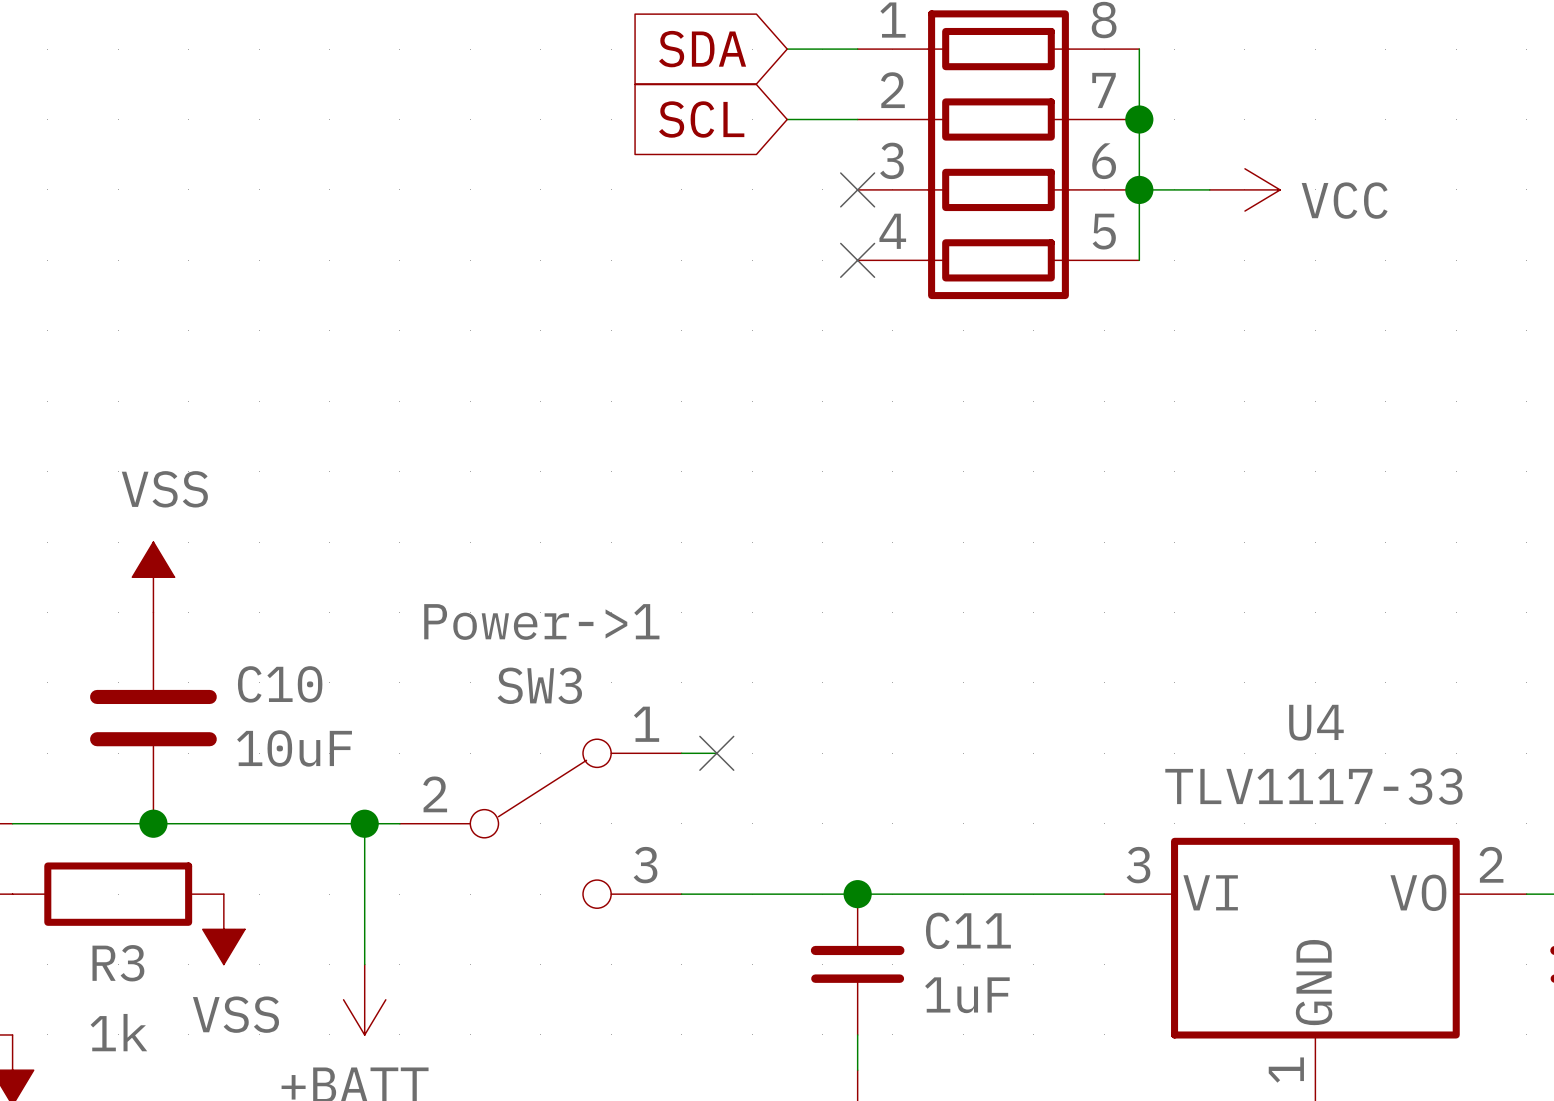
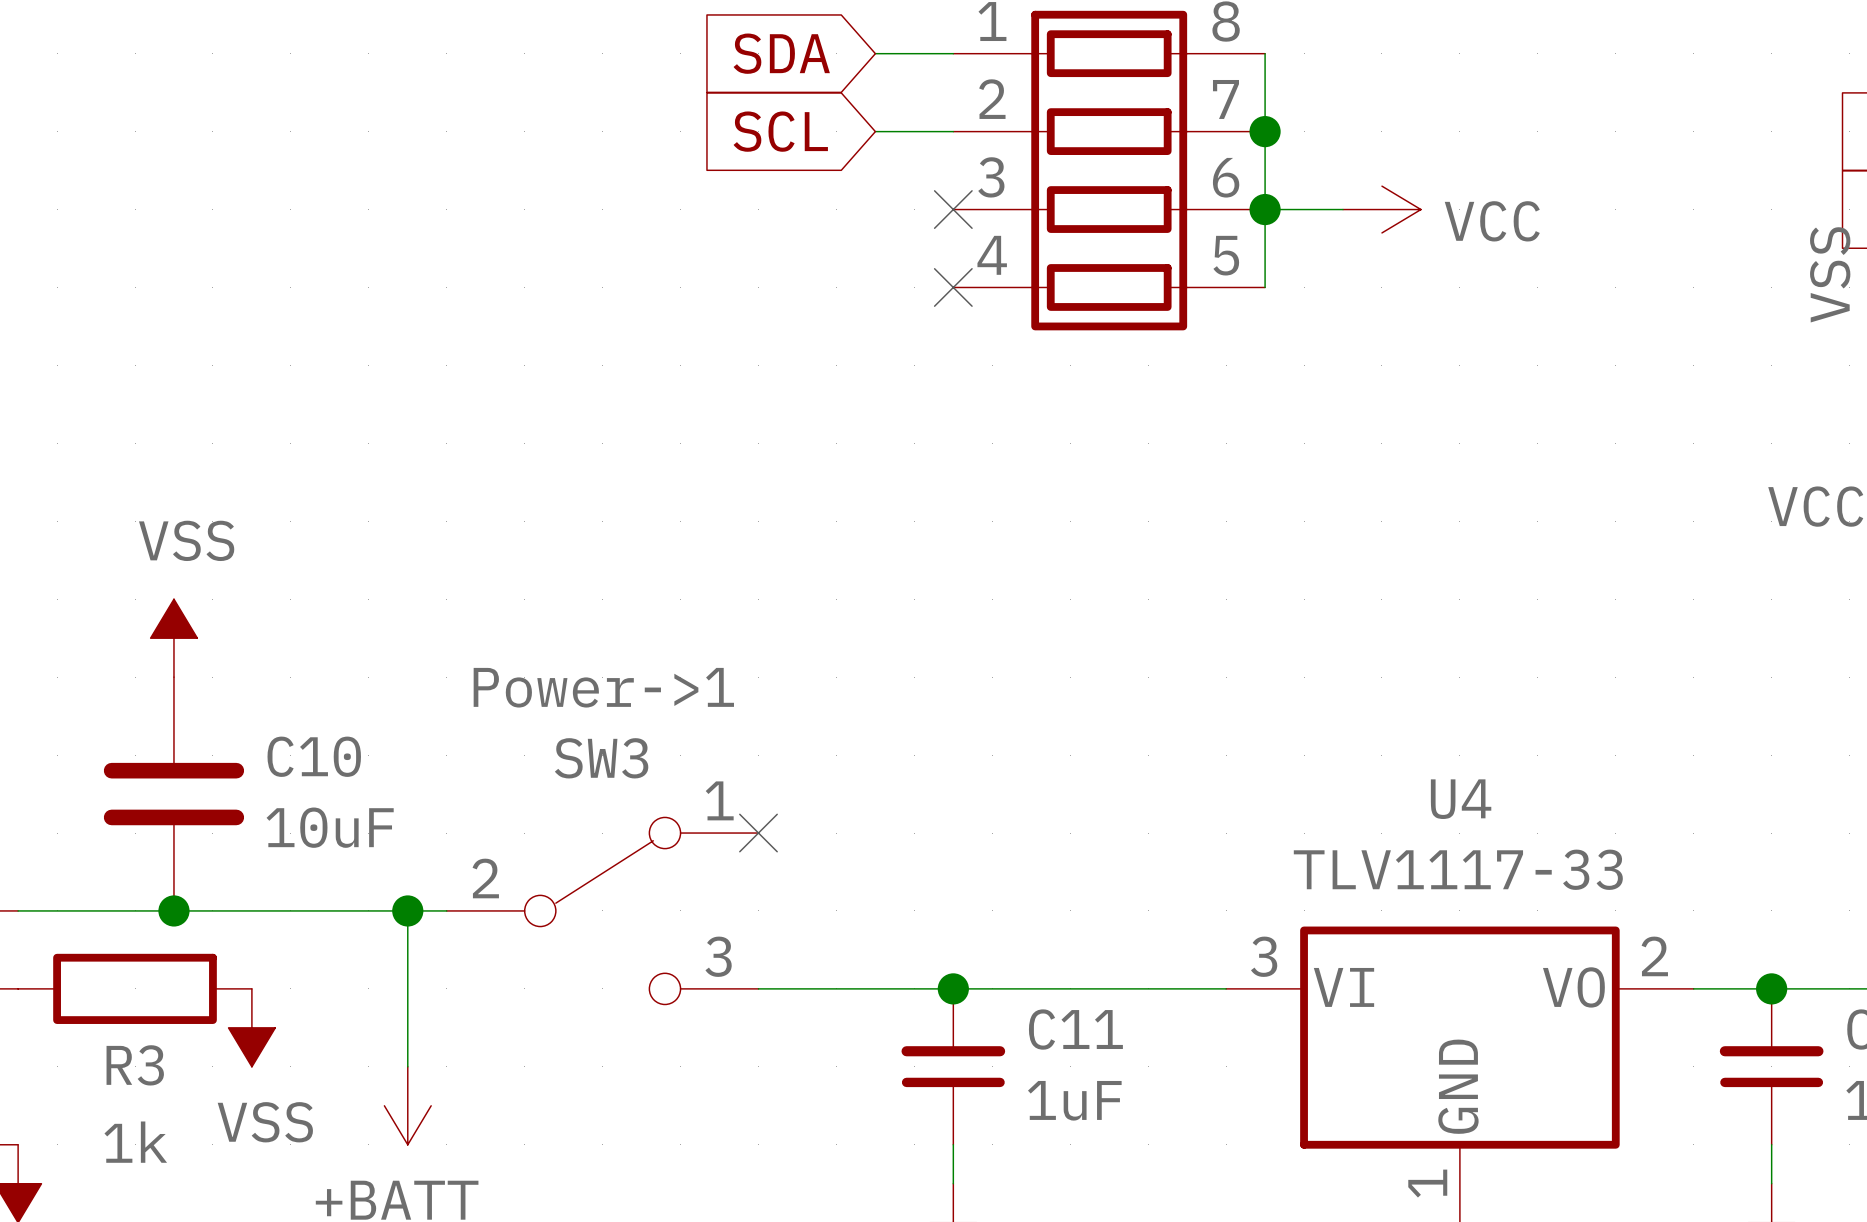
wire: (681, 753) (716, 753) -> none
no-connect mark position: (716, 753) -> (758, 833)

